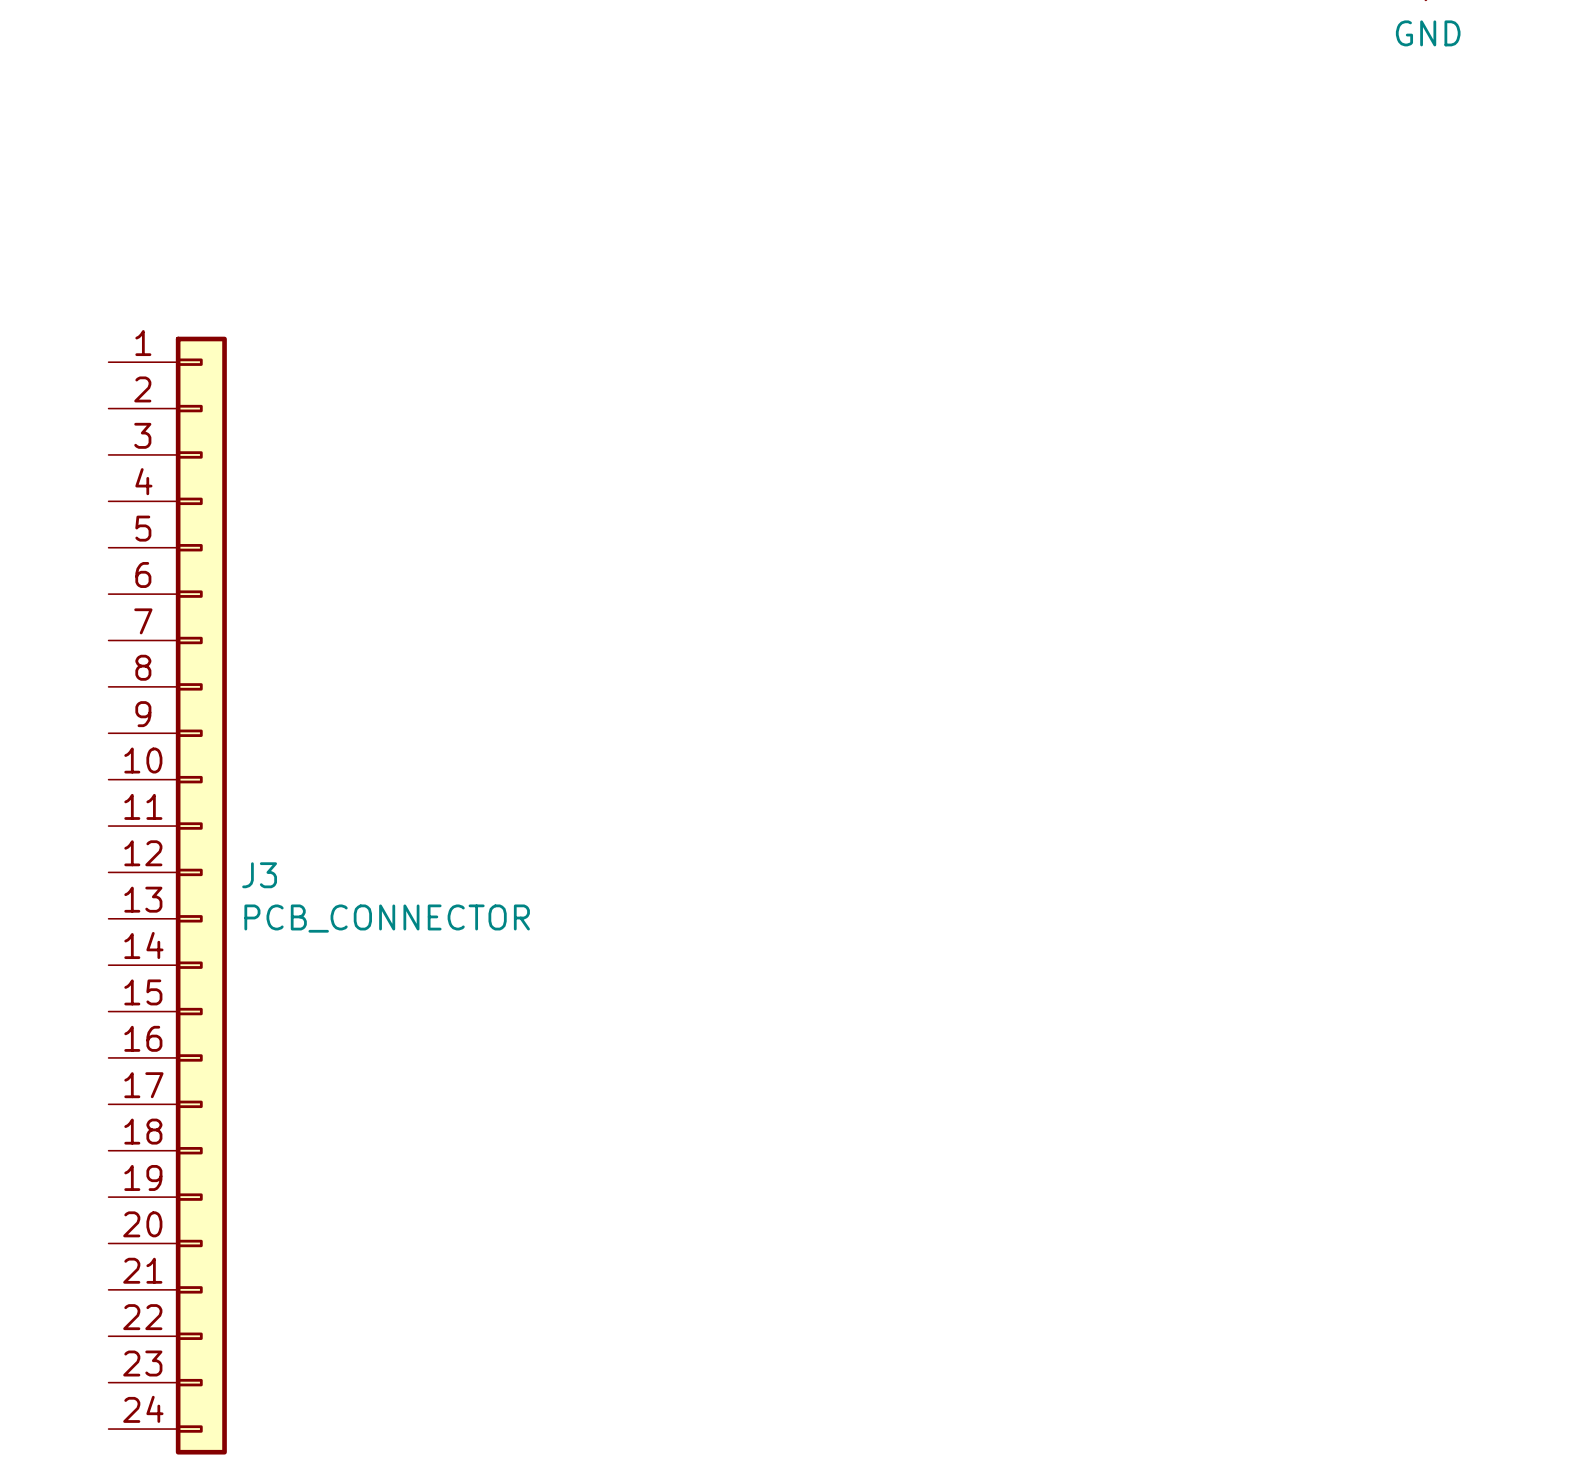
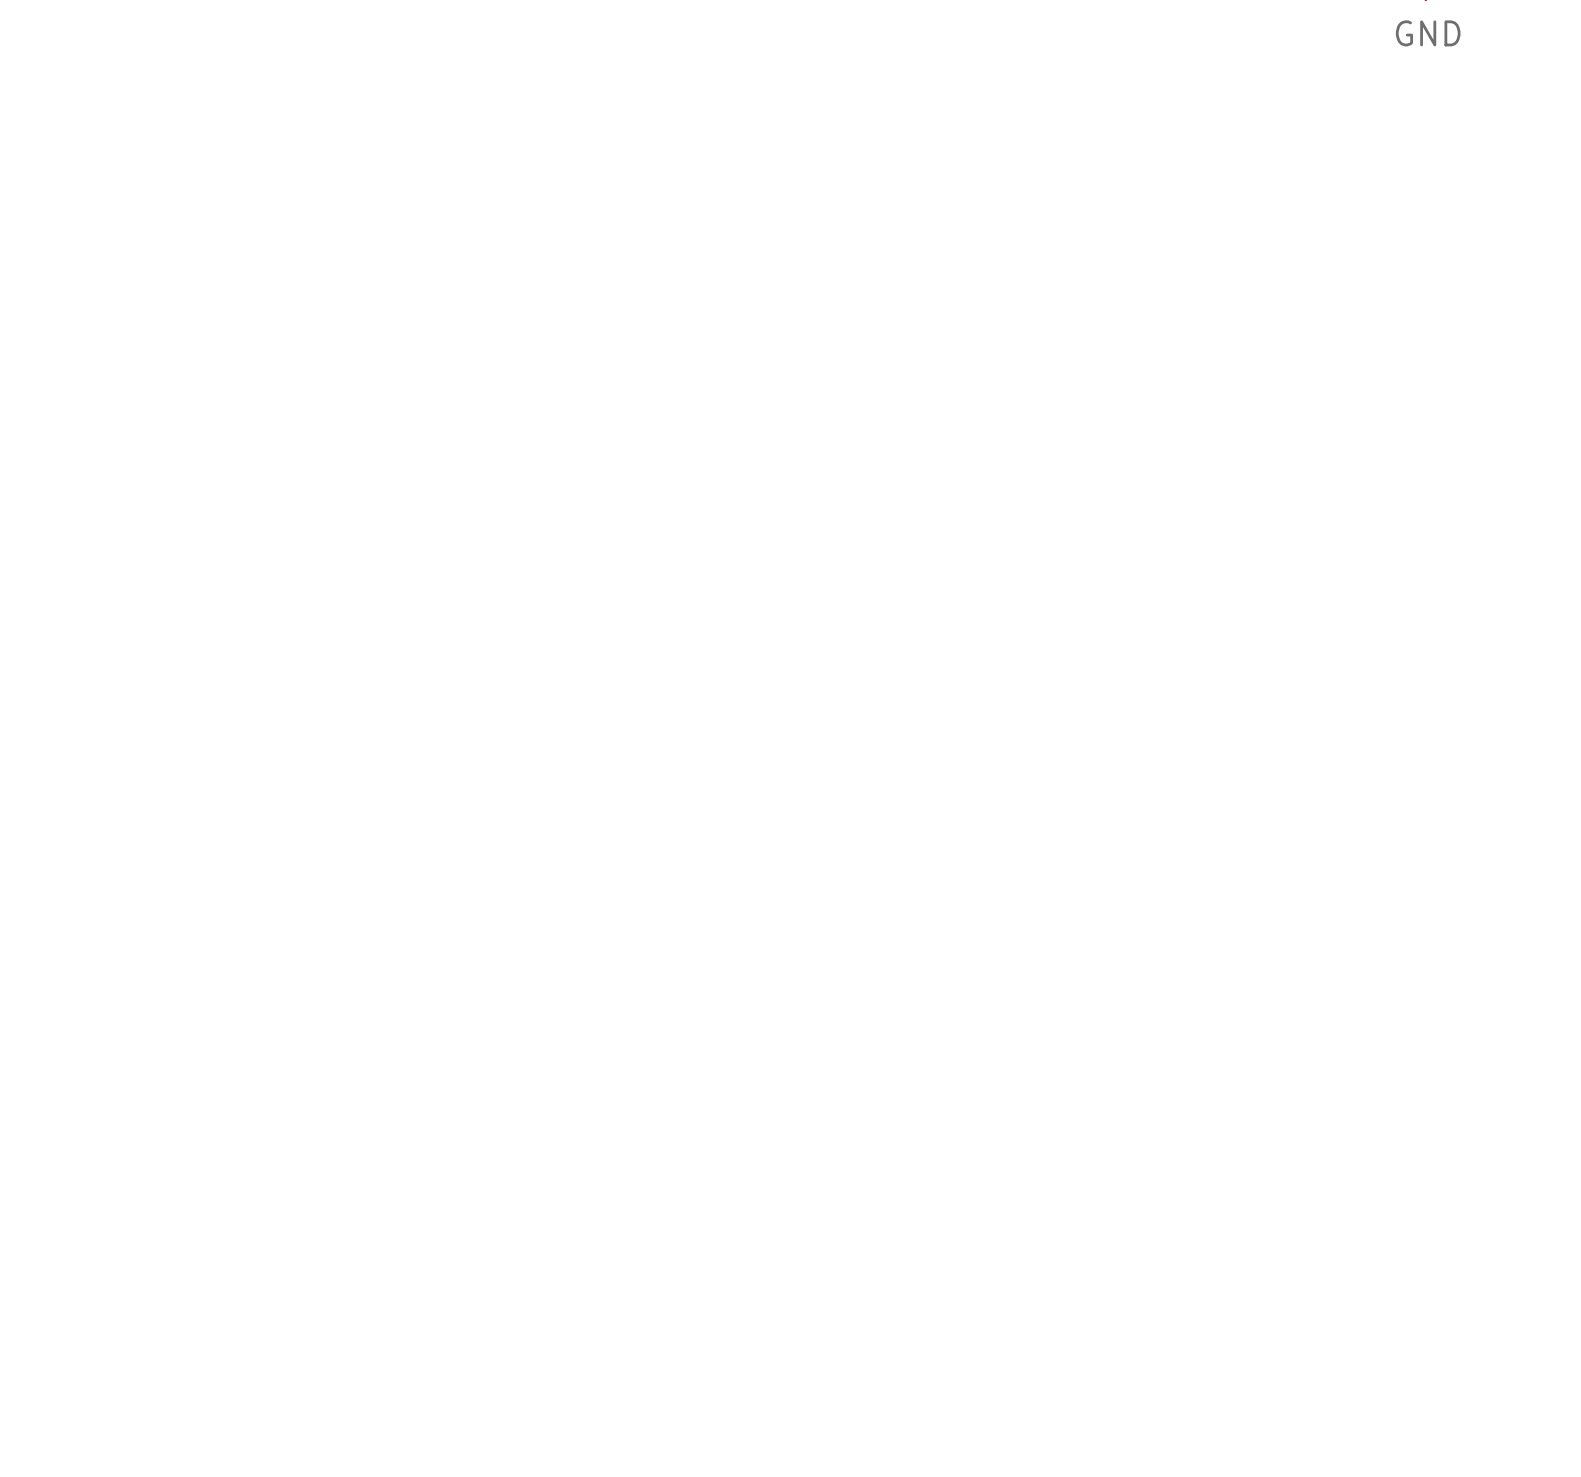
J3: PCB_CONNECTOR (167, 895) -> none

